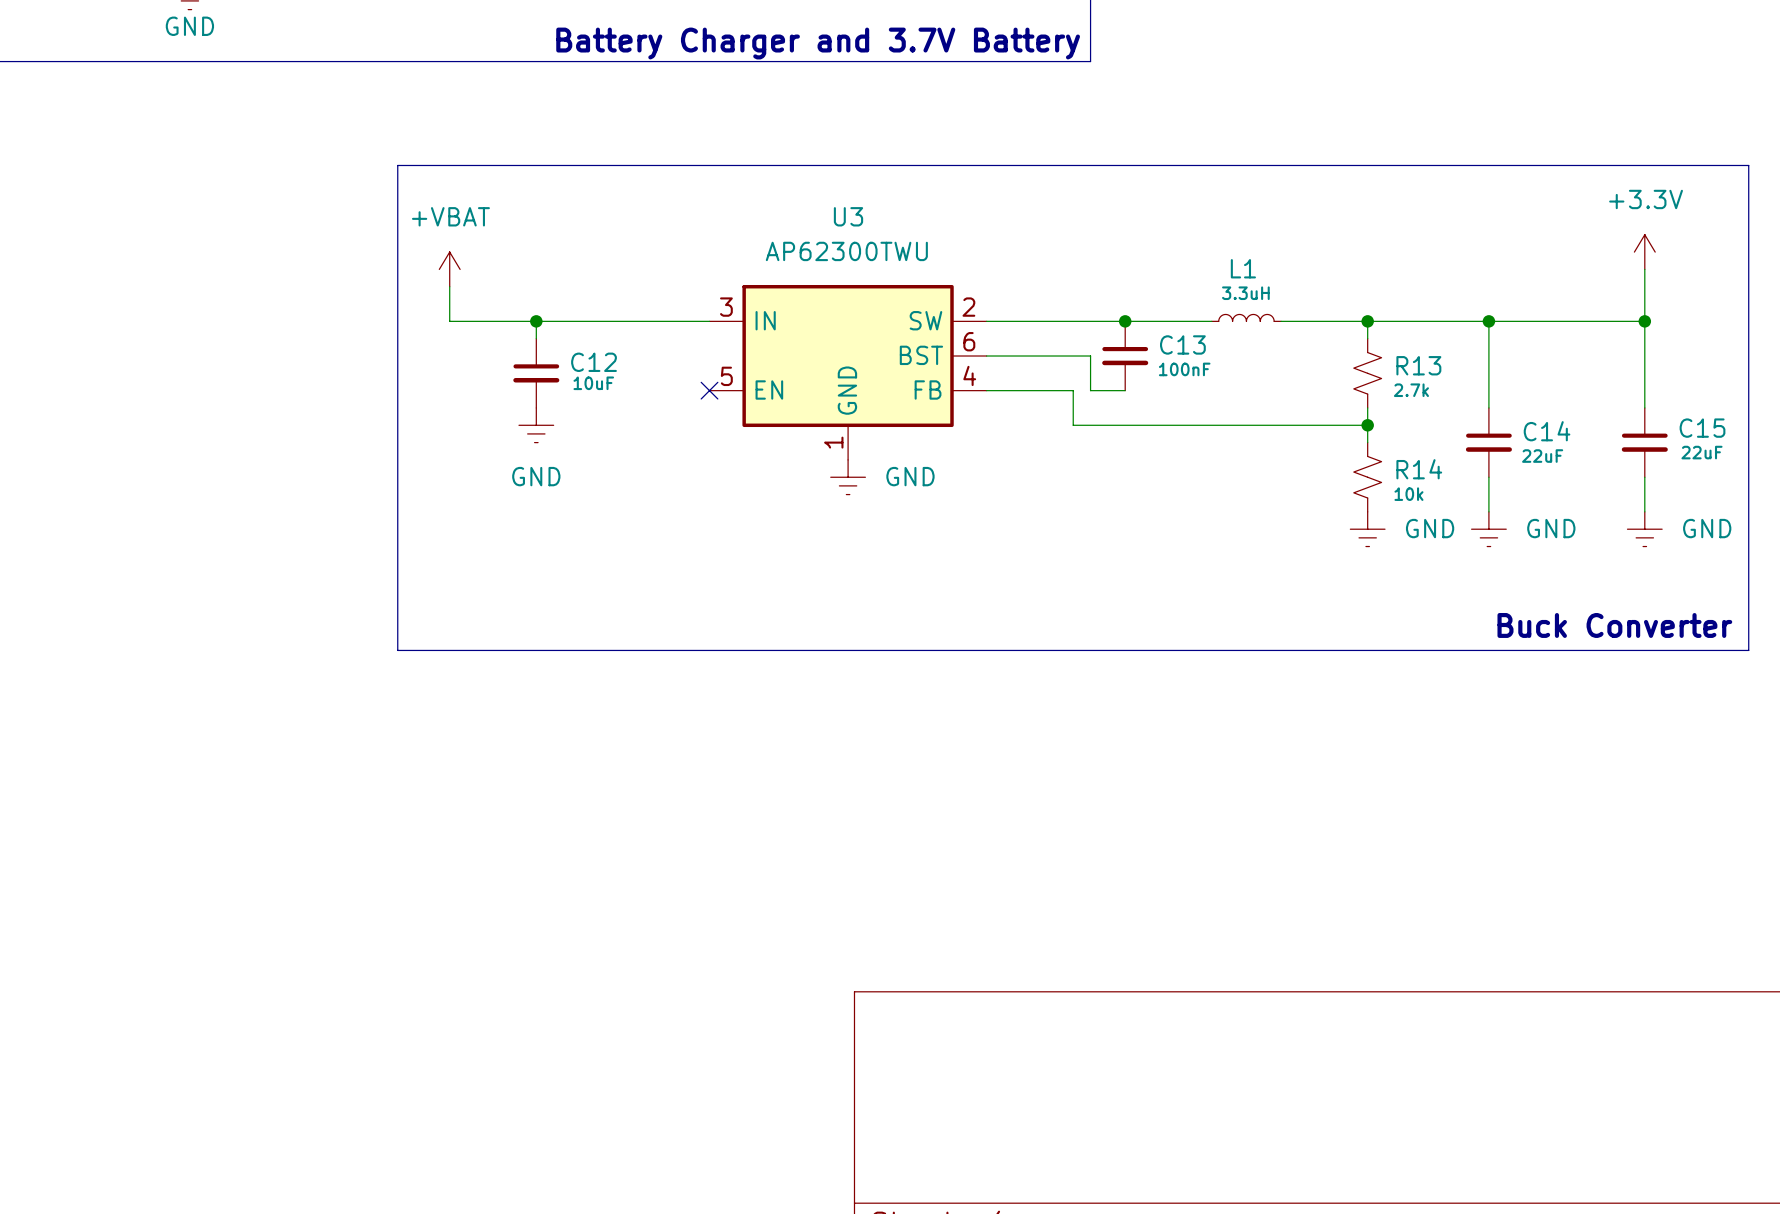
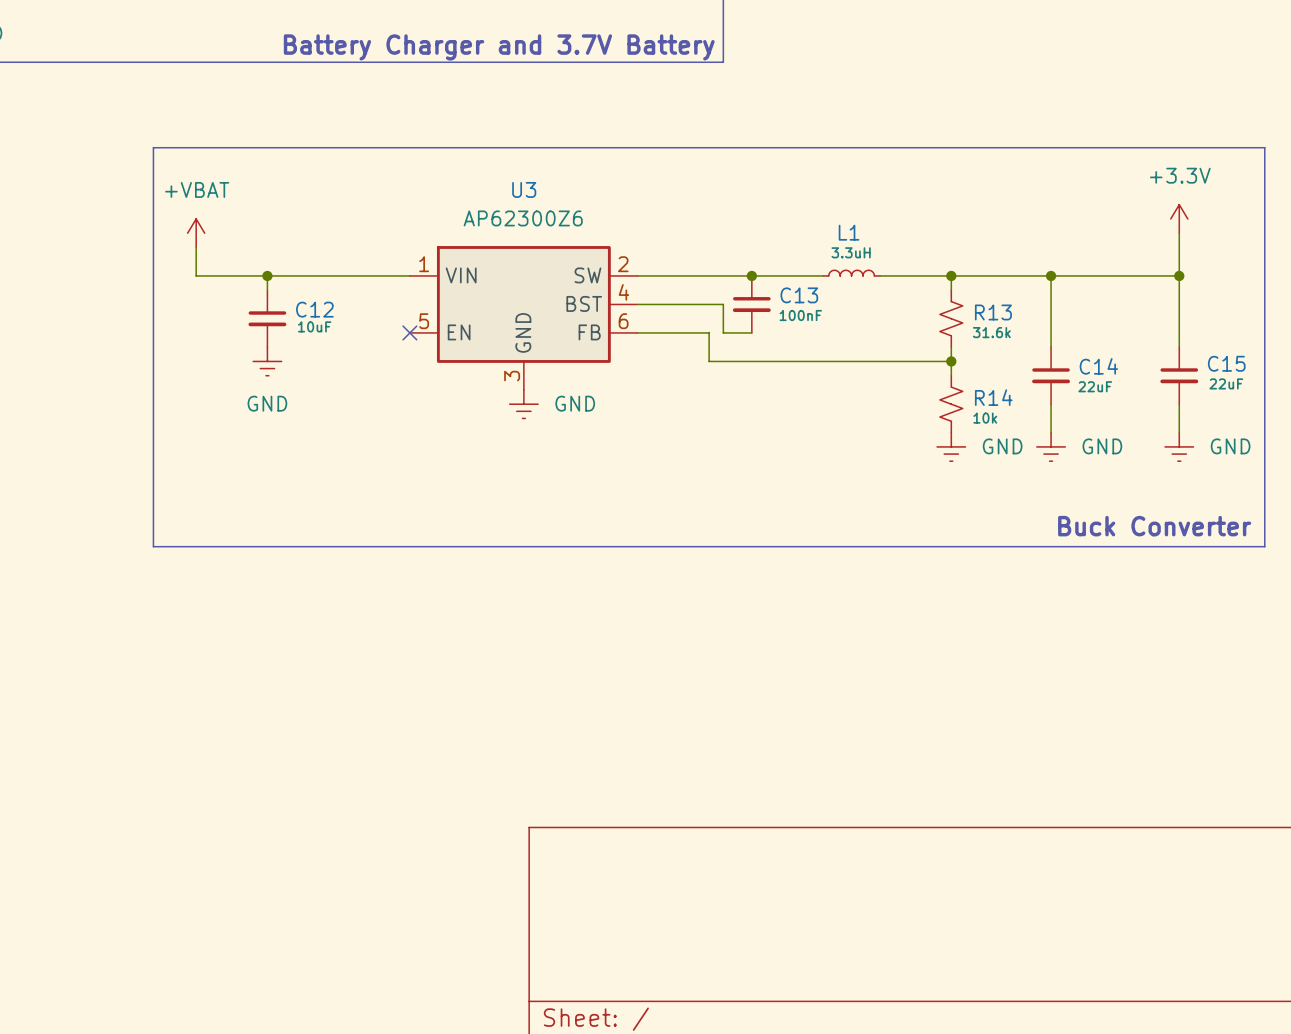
U3 value: AP62300TWU (846, 251) -> AP62300Z6 (523, 218)
U3 pin number: 3 (726, 307) -> 1 (424, 264)
U3 pin name: IN (765, 320) -> VIN (461, 275)
U3 pin number: 6 (969, 341) -> 4 (623, 292)
U3 pin number: 4 (969, 375) -> 6 (623, 321)
R13 value: 2.7k (1411, 390) -> 31.6k (991, 332)
U3 pin number: 1 (833, 442) -> 3 (512, 376)

